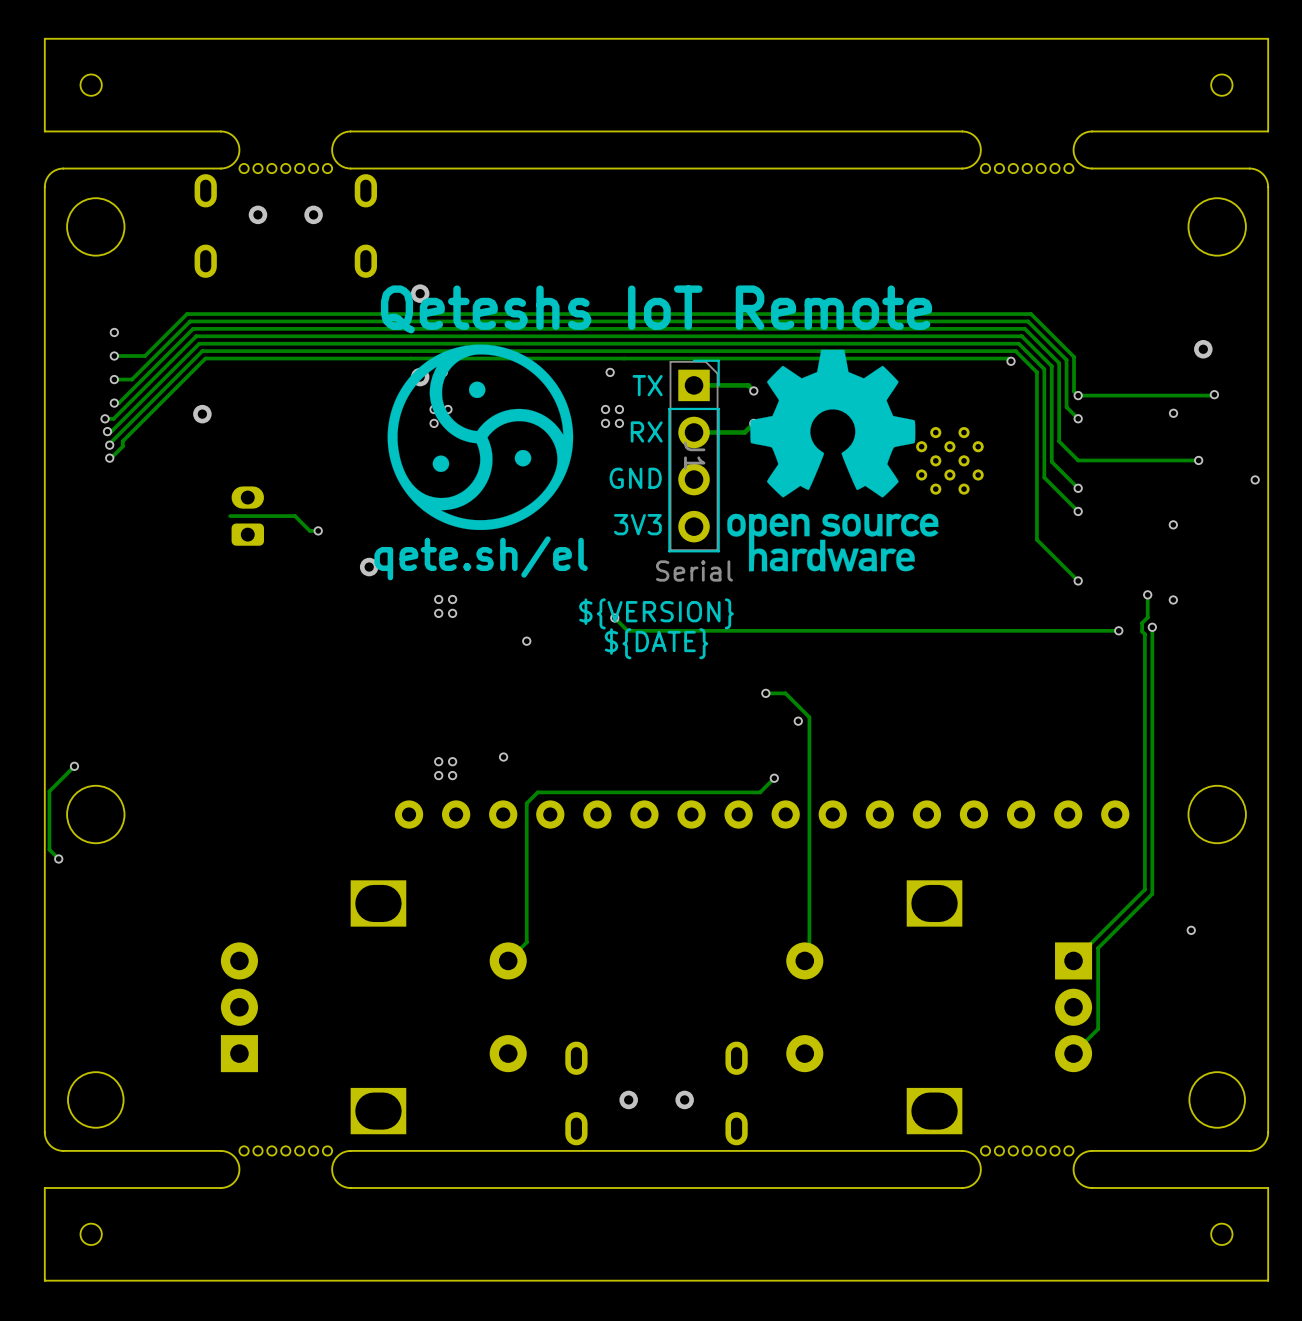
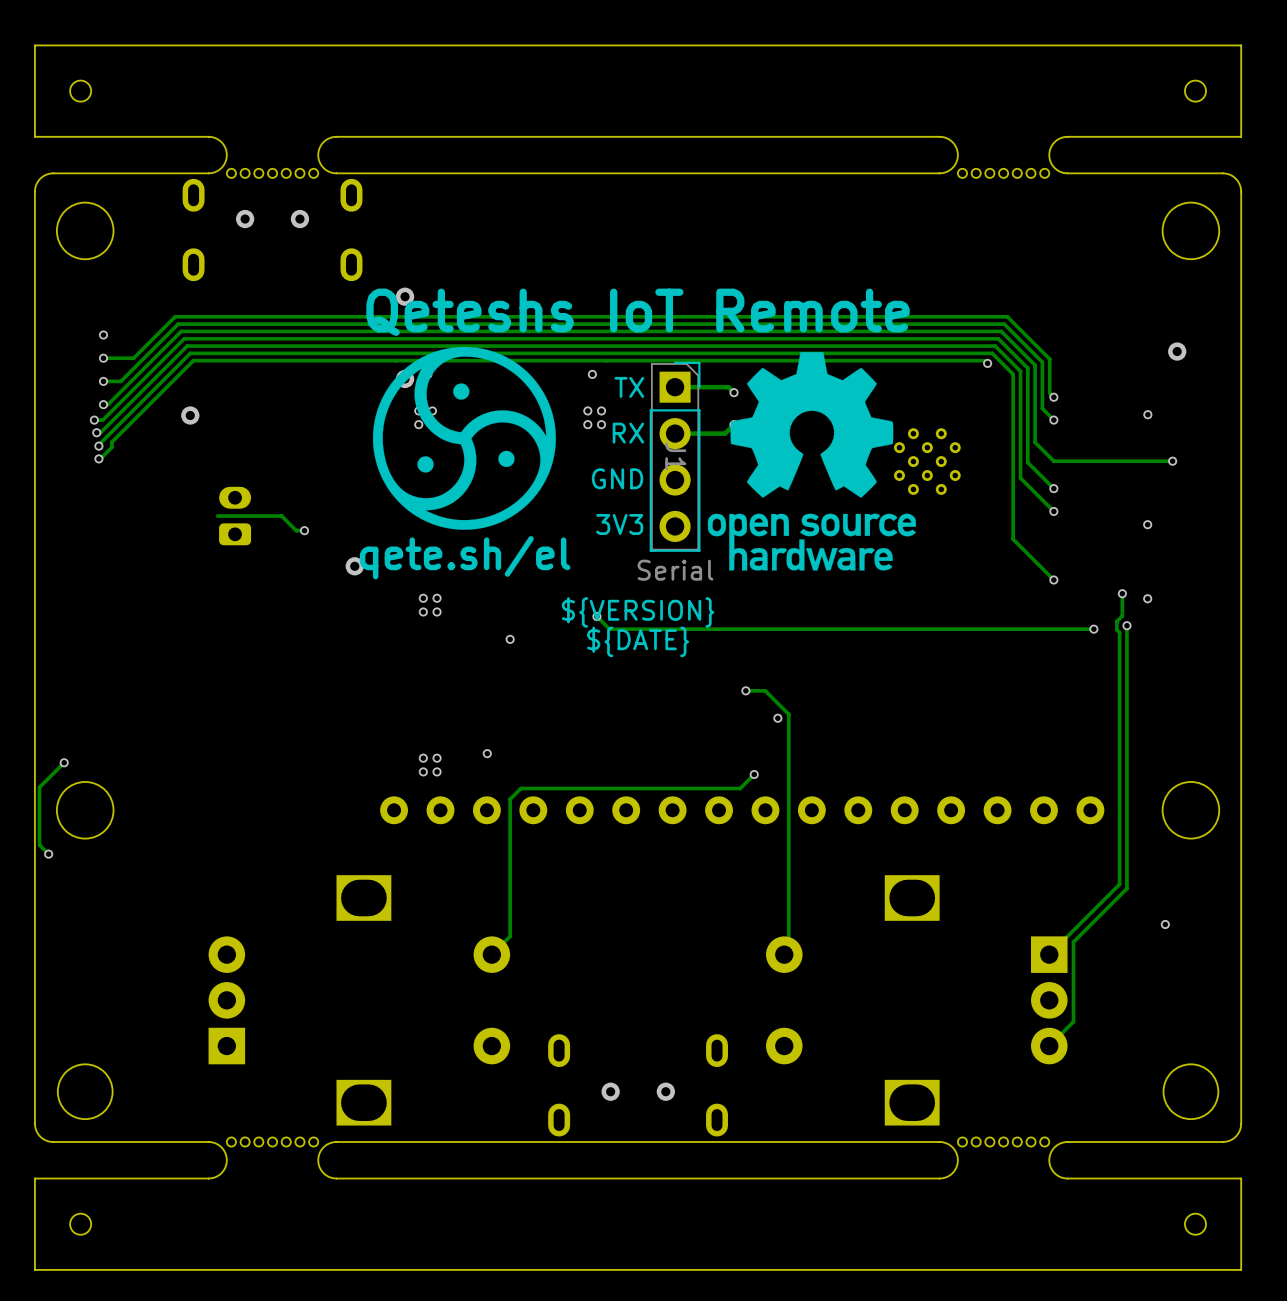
track: (1214, 394) (1078, 395) -> none
via: (1214, 394) -> none
via: (1255, 479) -> none

